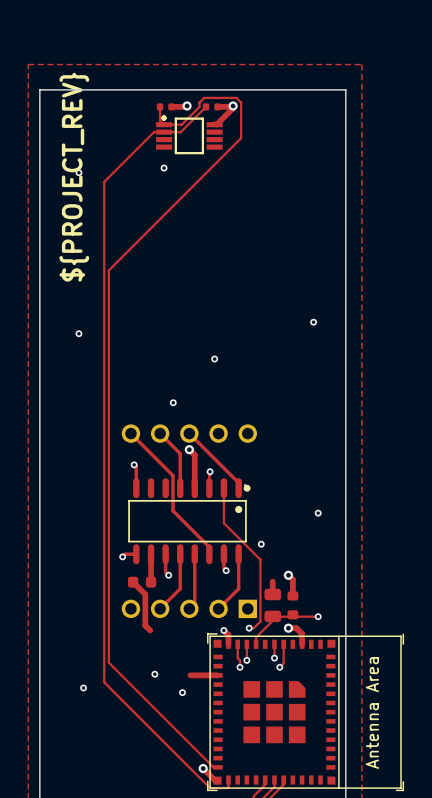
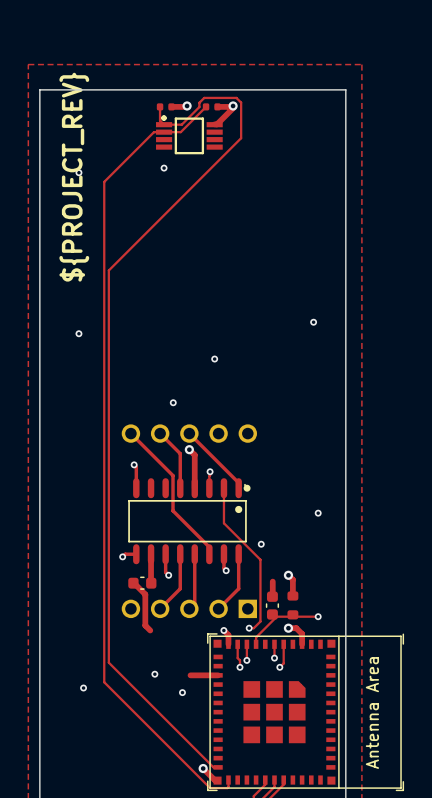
part footprint: [127, 576, 157, 588] -> [128, 576, 157, 590]
part footprint: [264, 588, 282, 623] -> [265, 591, 279, 620]

